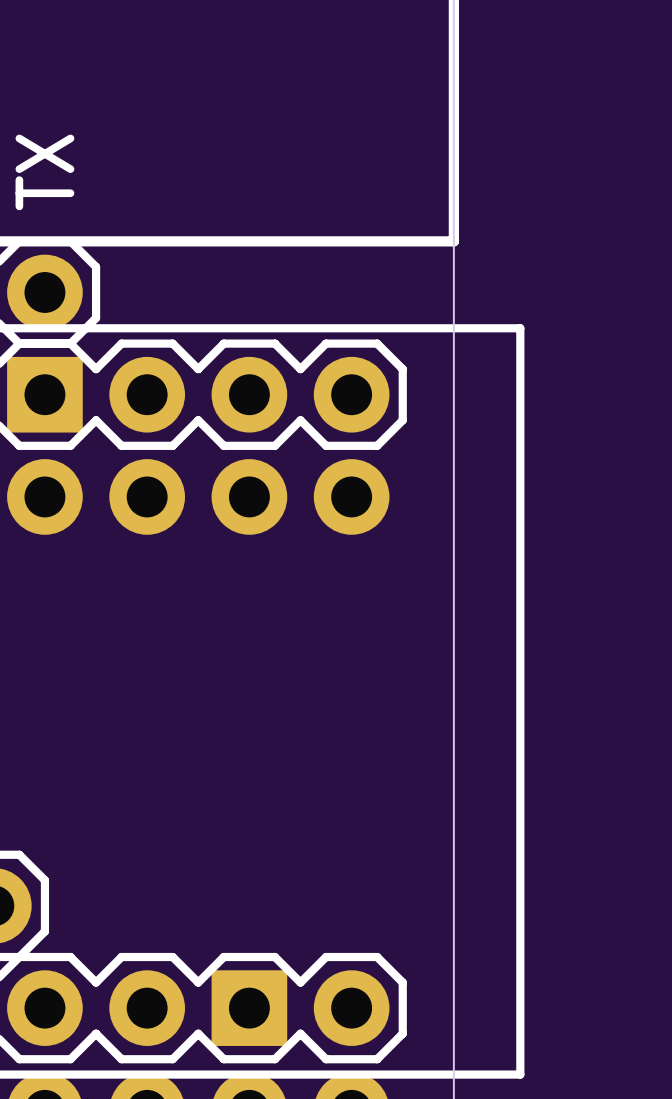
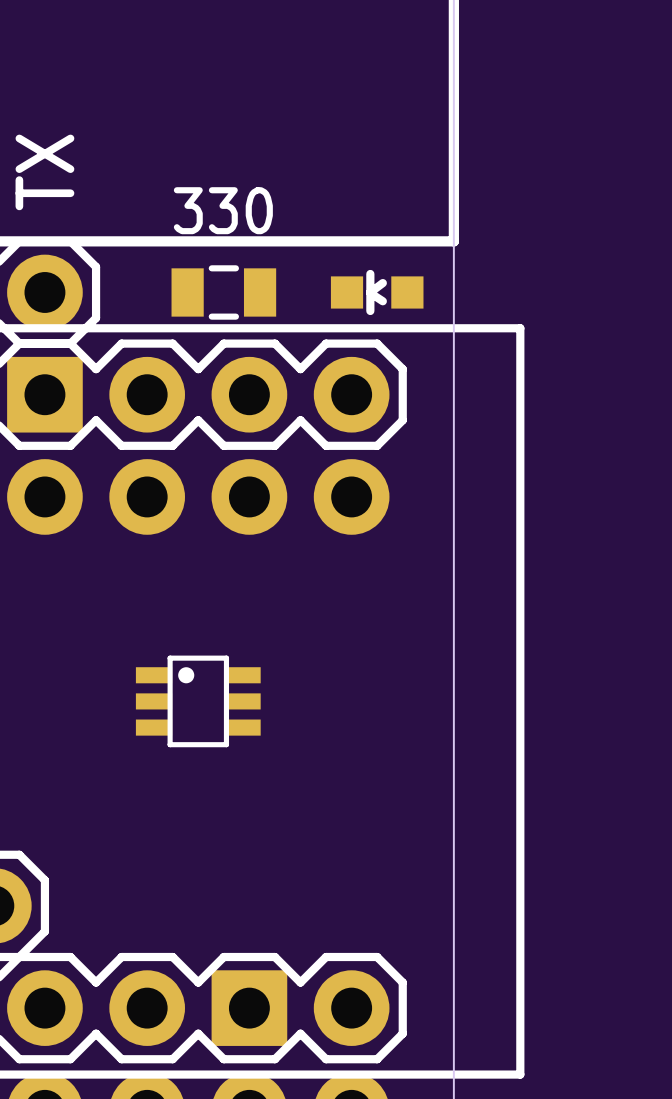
part: none -> 330 (223, 292)
part: none -> (377, 292)
part: none -> (198, 701)

